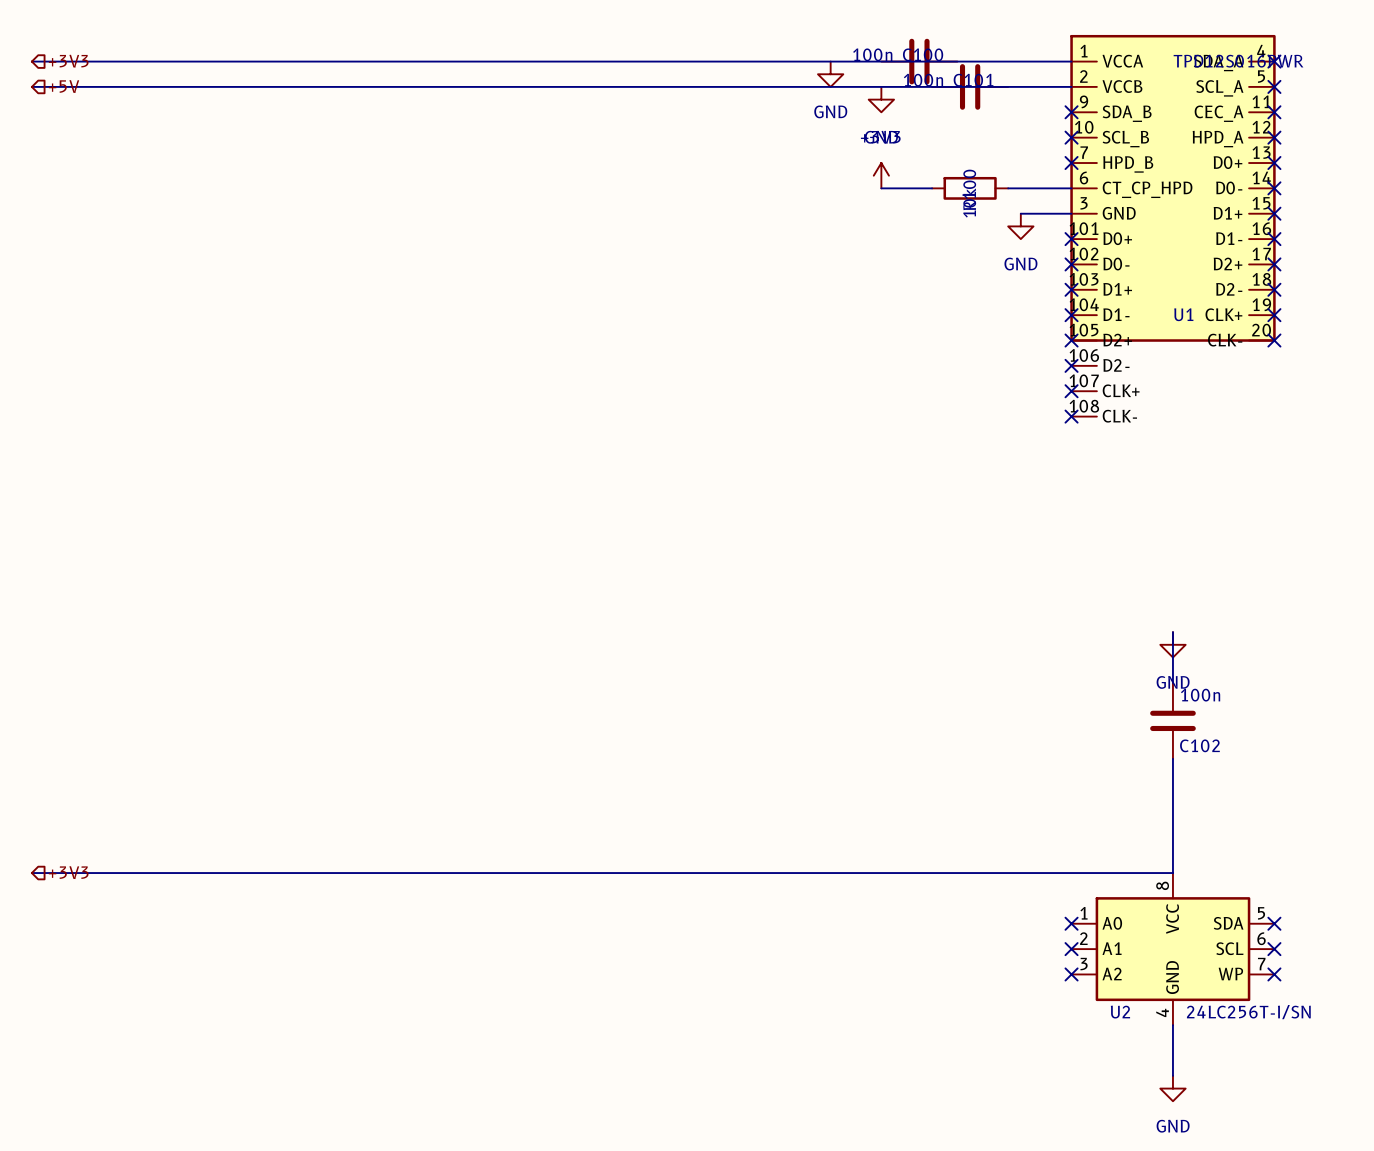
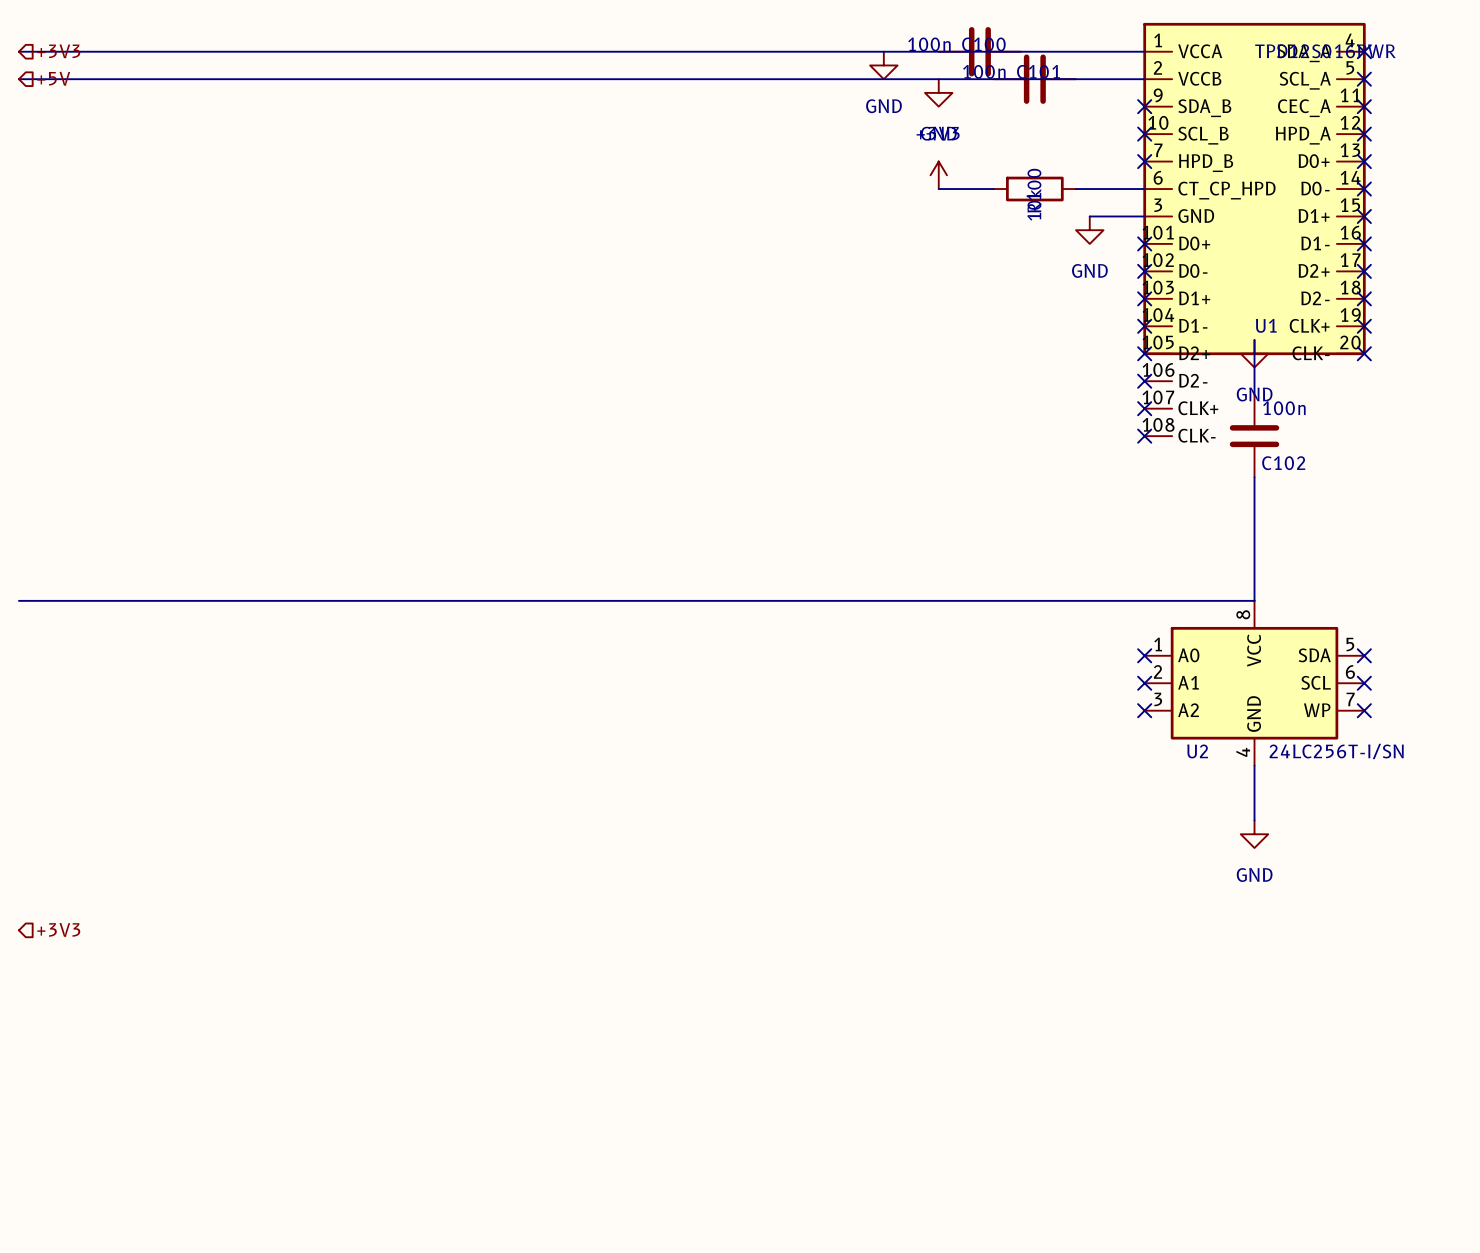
wire: none -> (1254, 340) (1254, 394)
power symbol: none -> GND (1254, 353)
wire: none -> (1254, 477) (1254, 600) (18, 600)
no-connect mark: none -> (1144, 655)
no-connect mark: none -> (1364, 655)
no-connect mark: none -> (1144, 683)
power symbol position: GND (1172, 644) -> GND (1254, 834)
no-connect mark: none -> (1364, 683)
no-connect mark: none -> (1144, 710)
no-connect mark: none -> (1364, 710)
C102 position: (1172, 720) -> (1254, 436)
wire: (1172, 771) (1172, 873) (31, 873) -> none
no-connect mark: (1071, 923) -> none
no-connect mark: (1274, 923) -> none
no-connect mark: (1071, 949) -> none
U2 position: (1172, 949) -> (1254, 683)
no-connect mark: (1274, 949) -> none
no-connect mark: (1071, 974) -> none
no-connect mark: (1274, 974) -> none
wire: (1172, 1025) (1172, 1075) -> none
power symbol: GND (1172, 1088) -> none

